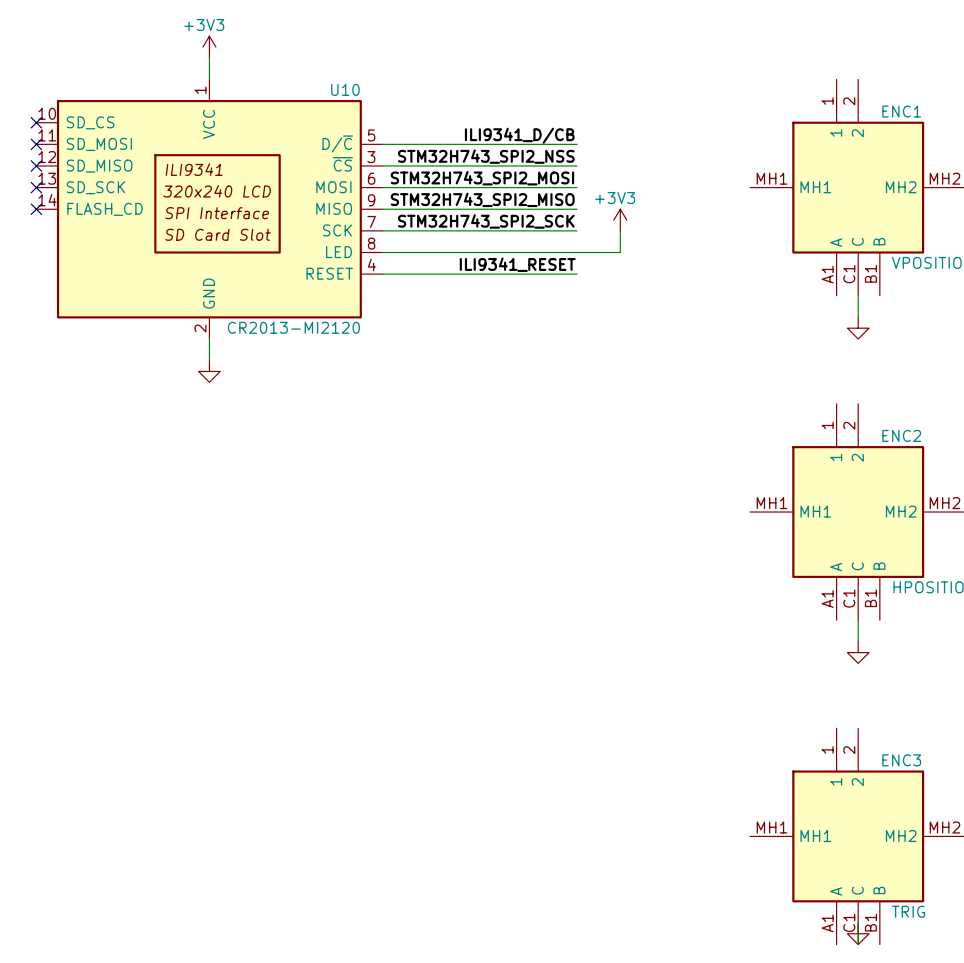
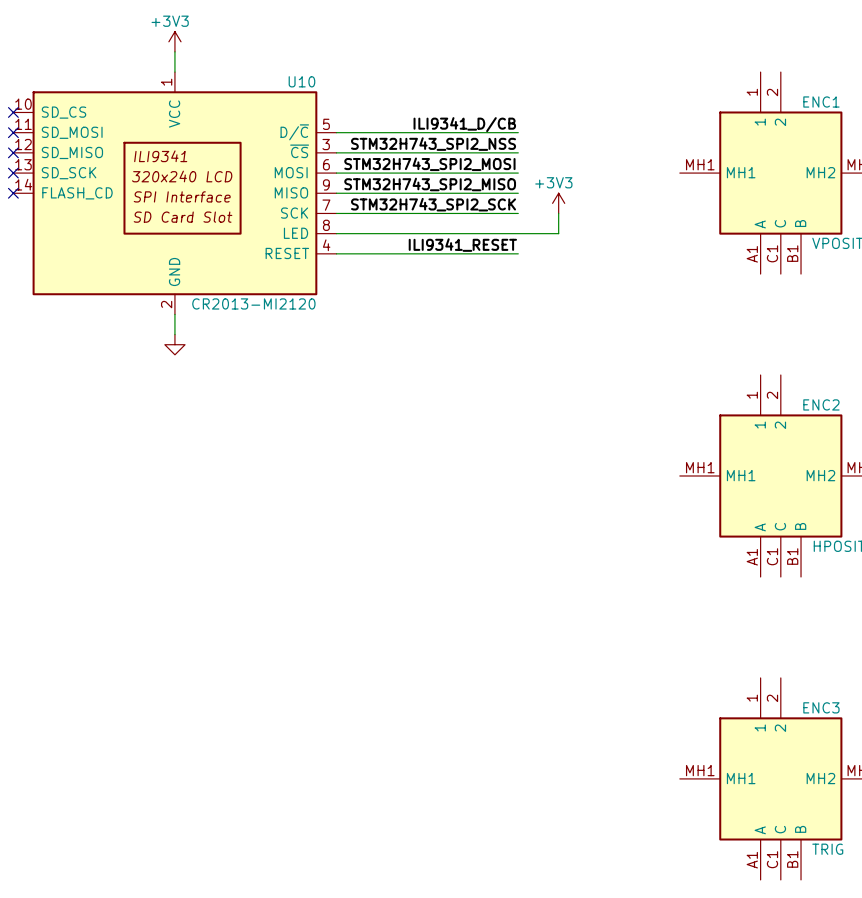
wire: (858, 295) (858, 317) -> none
power symbol: (858, 328) -> none
wire: (858, 620) (858, 641) -> none
power symbol: (858, 652) -> none
power symbol: (858, 933) -> none

